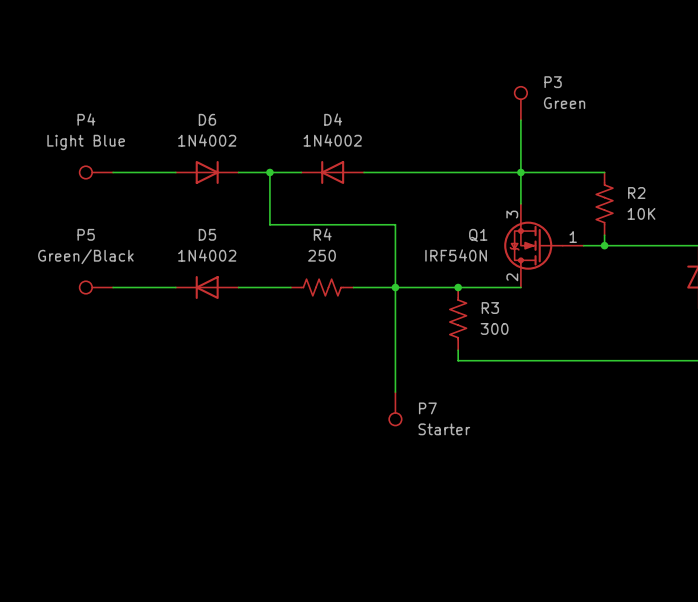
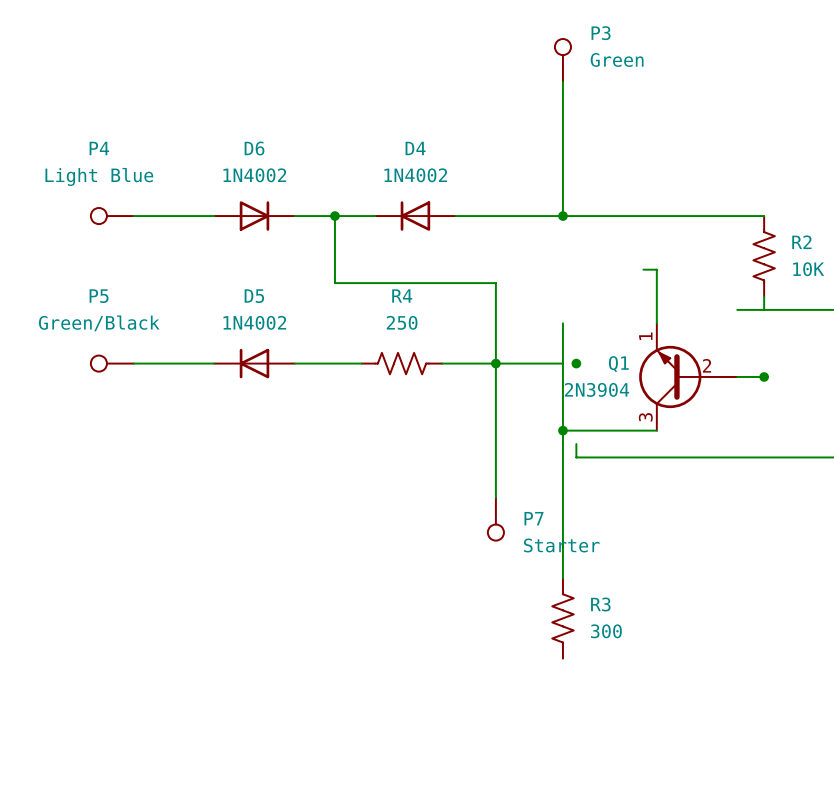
wire: none -> (562, 81) (562, 216)
P3 position: (520, 103) -> (562, 60)
wire: (520, 120) (520, 203) -> none
junction: none -> (562, 216)
junction: (520, 172) -> none
Q1 symbol: [504, 203, 584, 288] -> [639, 323, 738, 431]
junction: (604, 245) -> none
Q1 value: IRF540N (456, 255) -> 2N3904 (597, 389)
wire: none -> (562, 323) (562, 578)
wire: (447, 287) (520, 287) -> (562, 430) (656, 430)
wire: none -> (737, 376) (764, 376)
junction: none -> (764, 376)
R3 position: (458, 318) -> (562, 618)
junction: none -> (562, 430)

